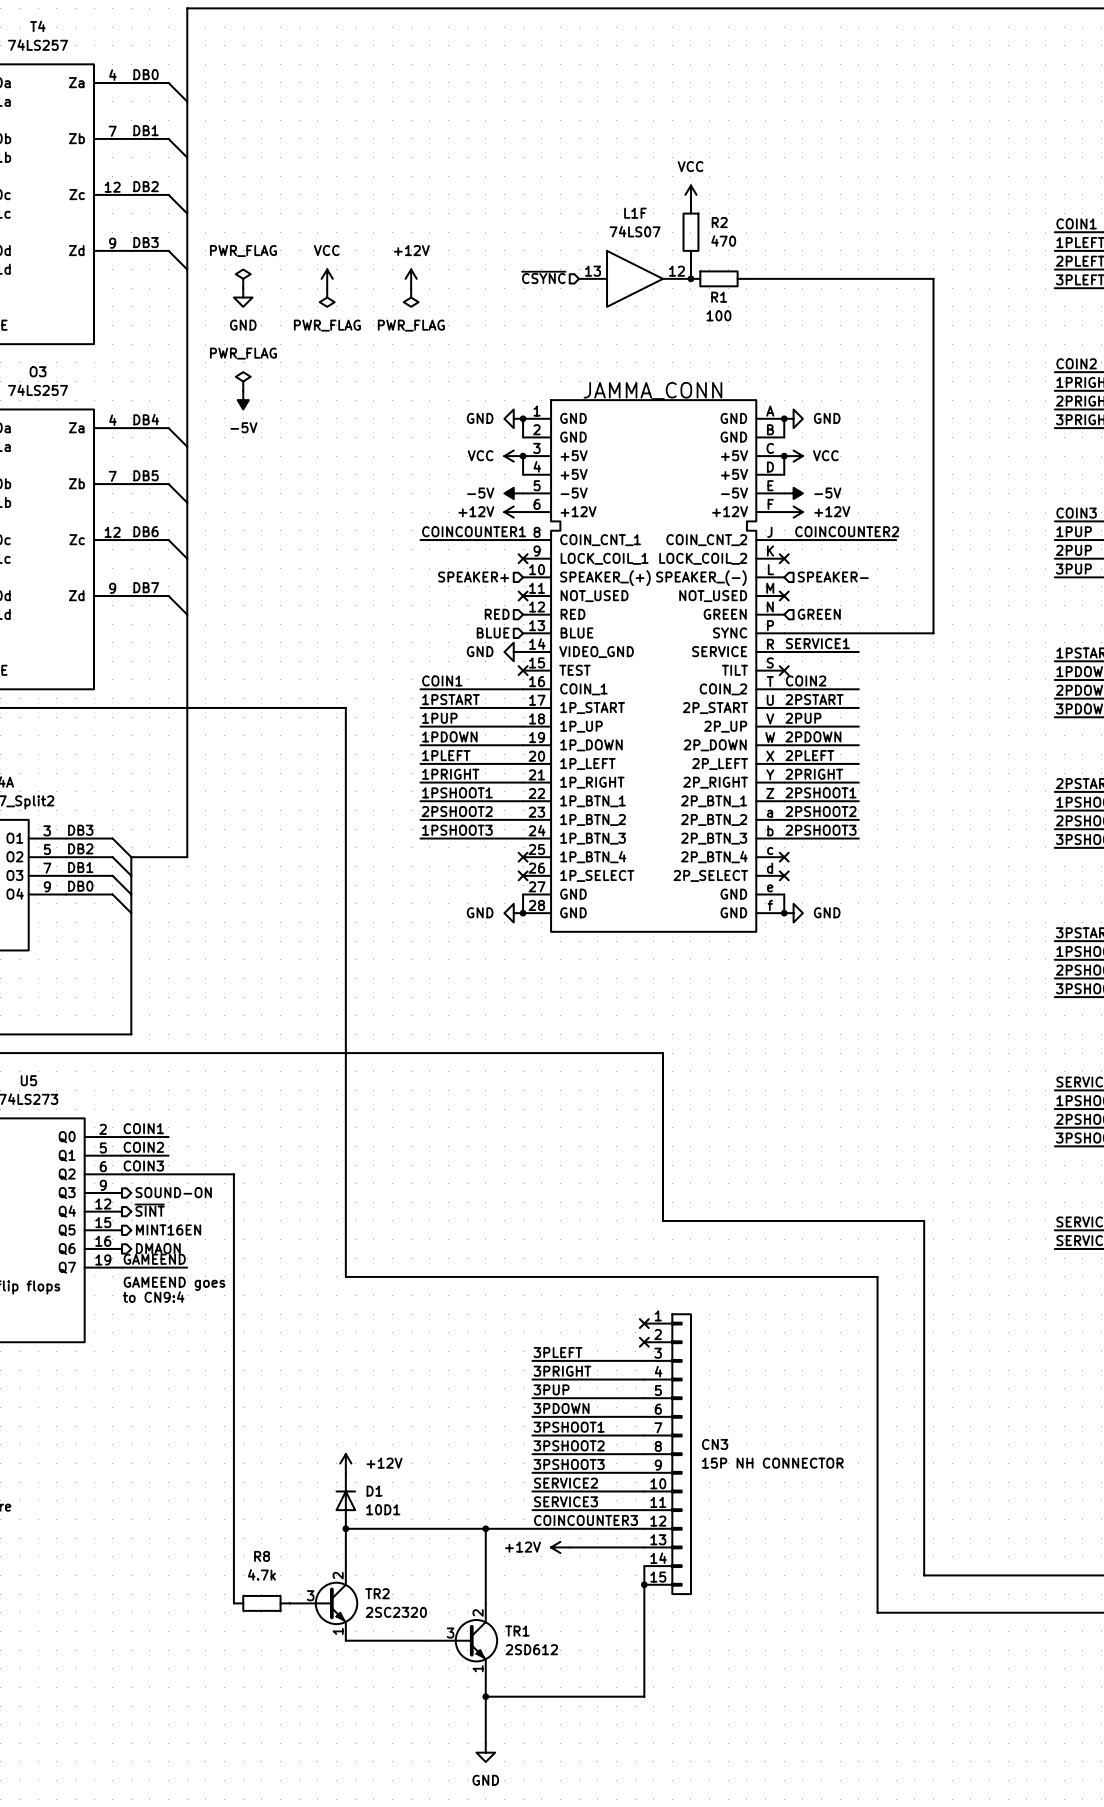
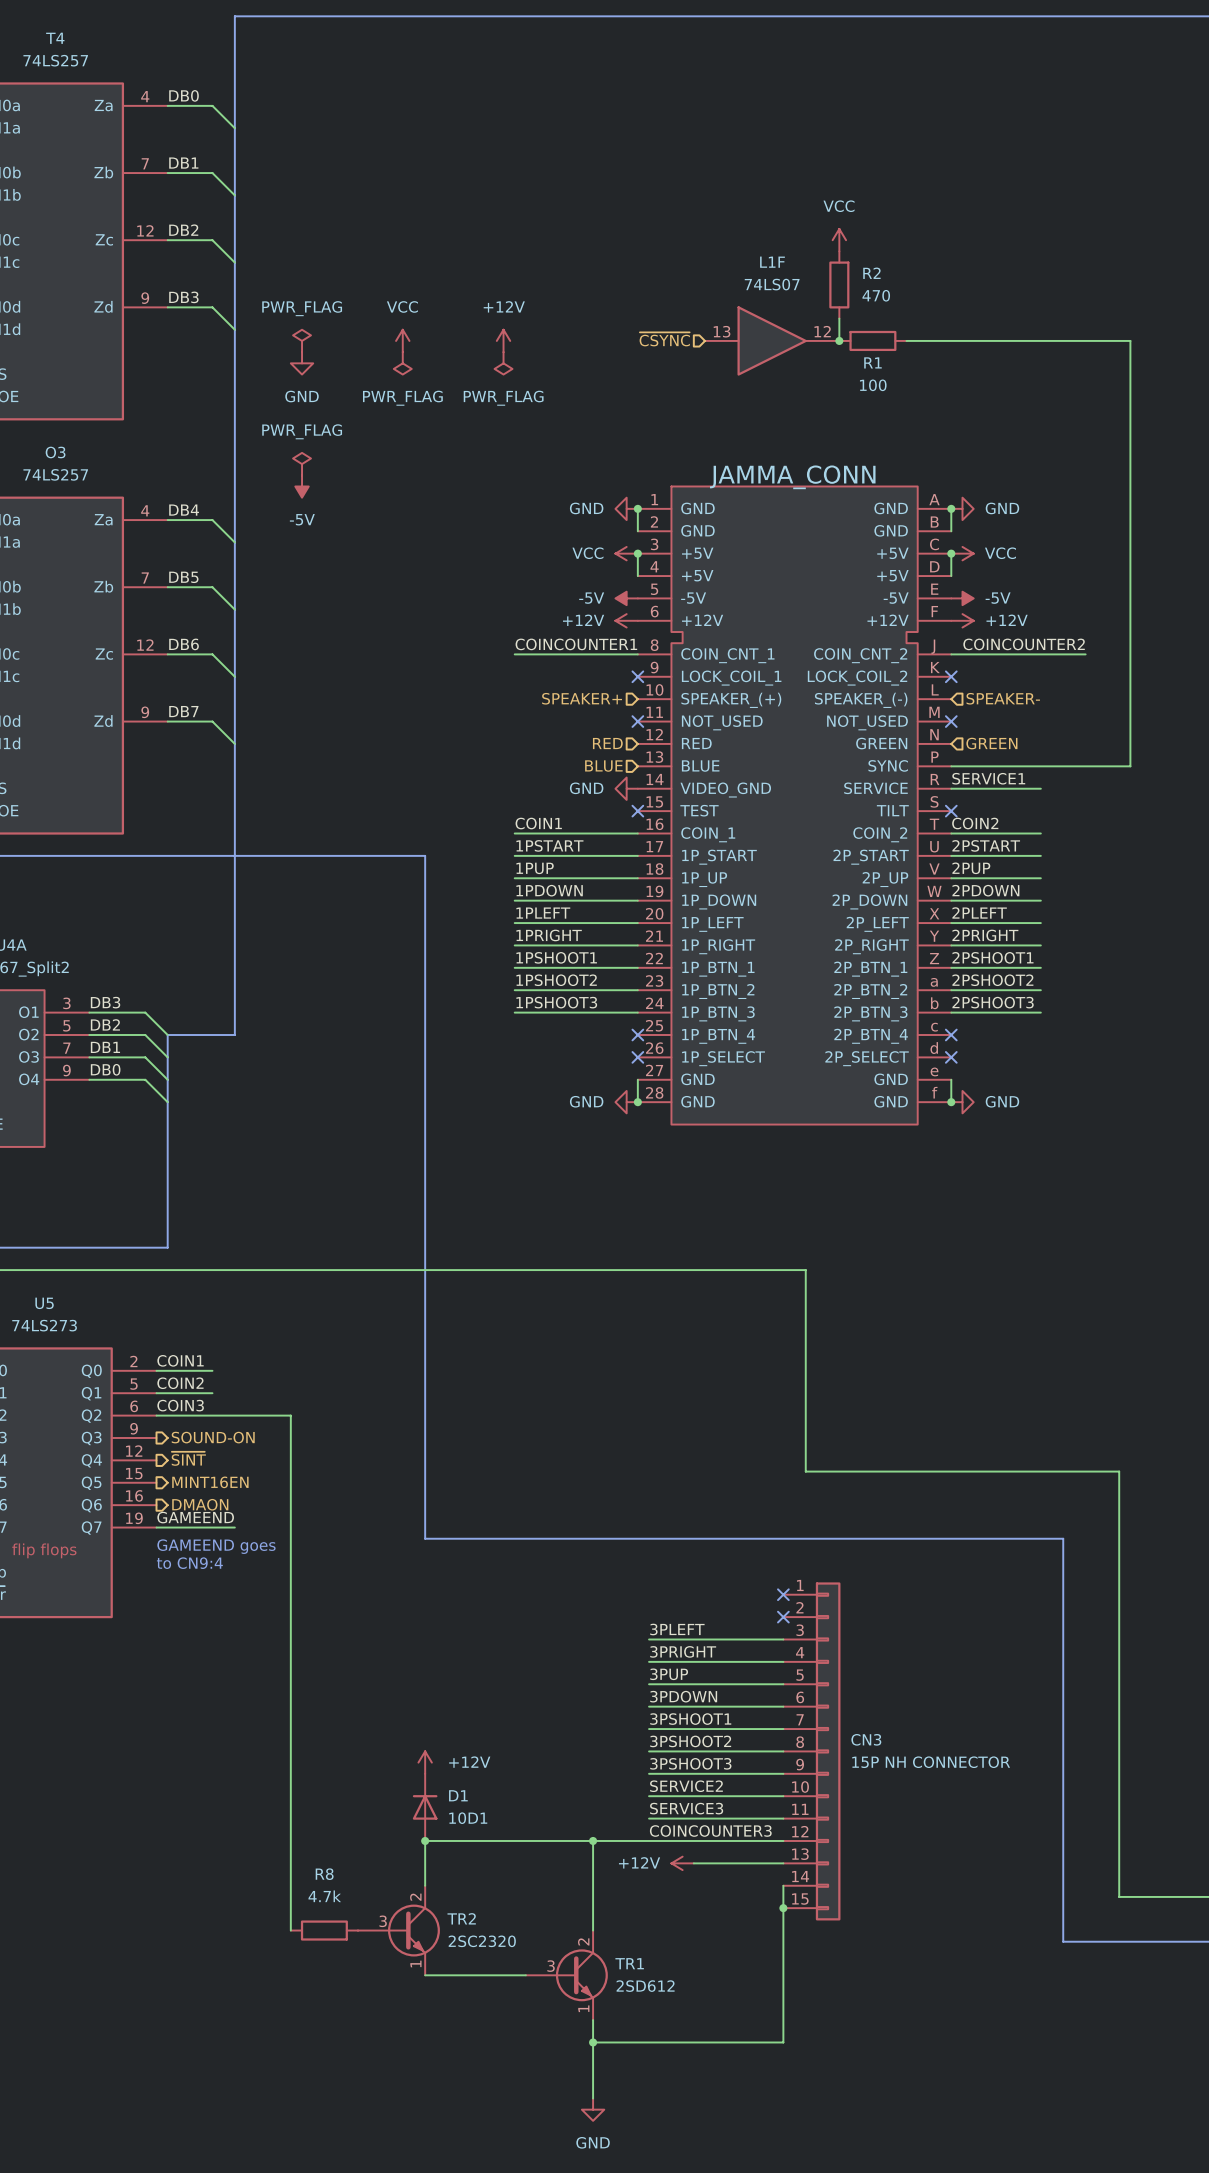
label: 2PSHOOT2 (457, 811) -> 1PSHOOT2 (556, 980)

